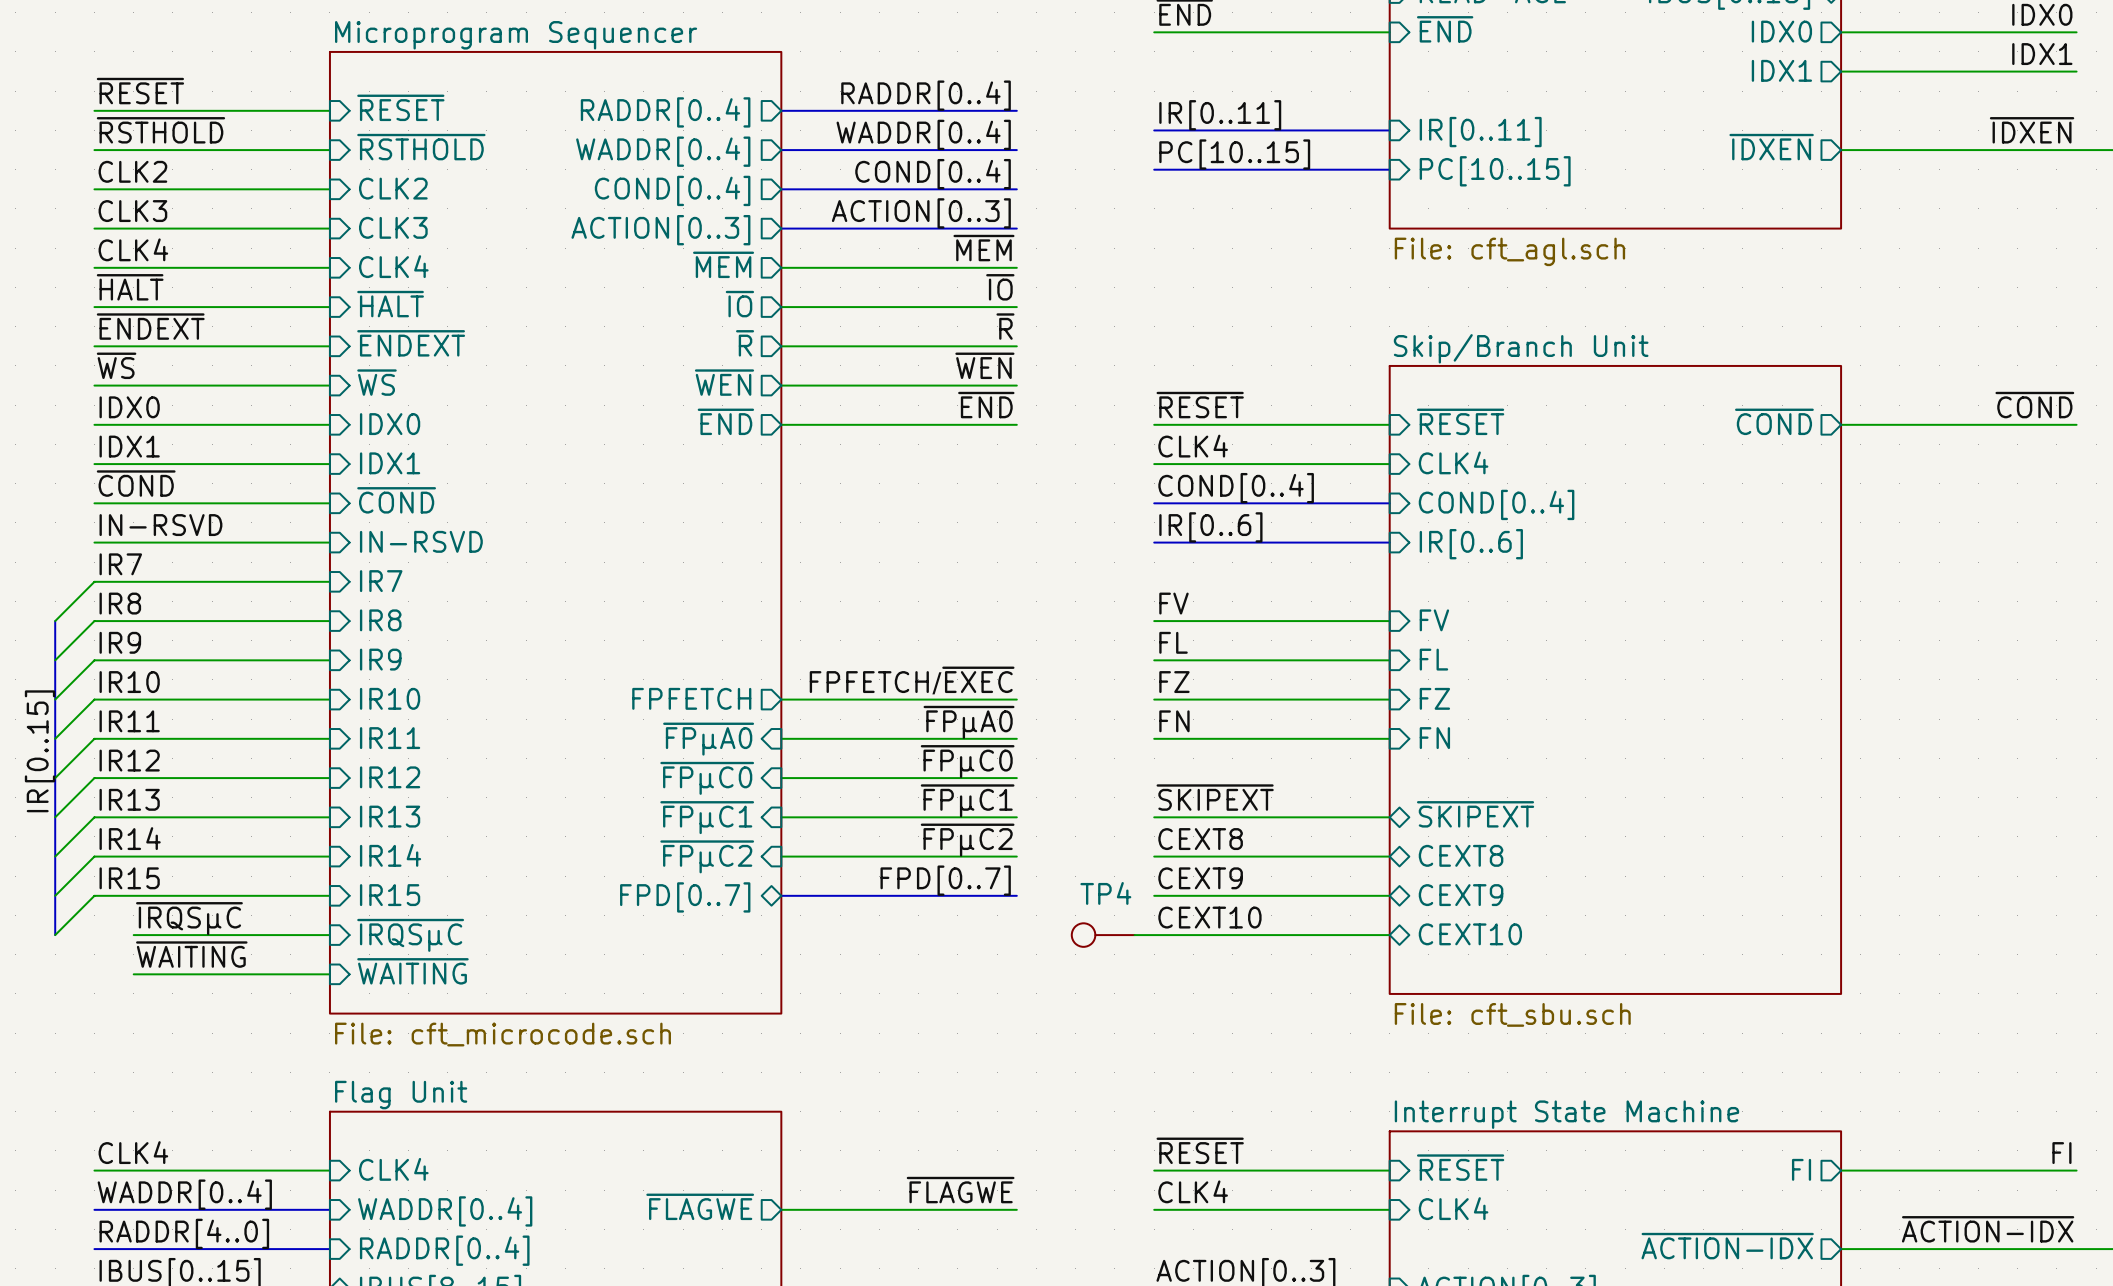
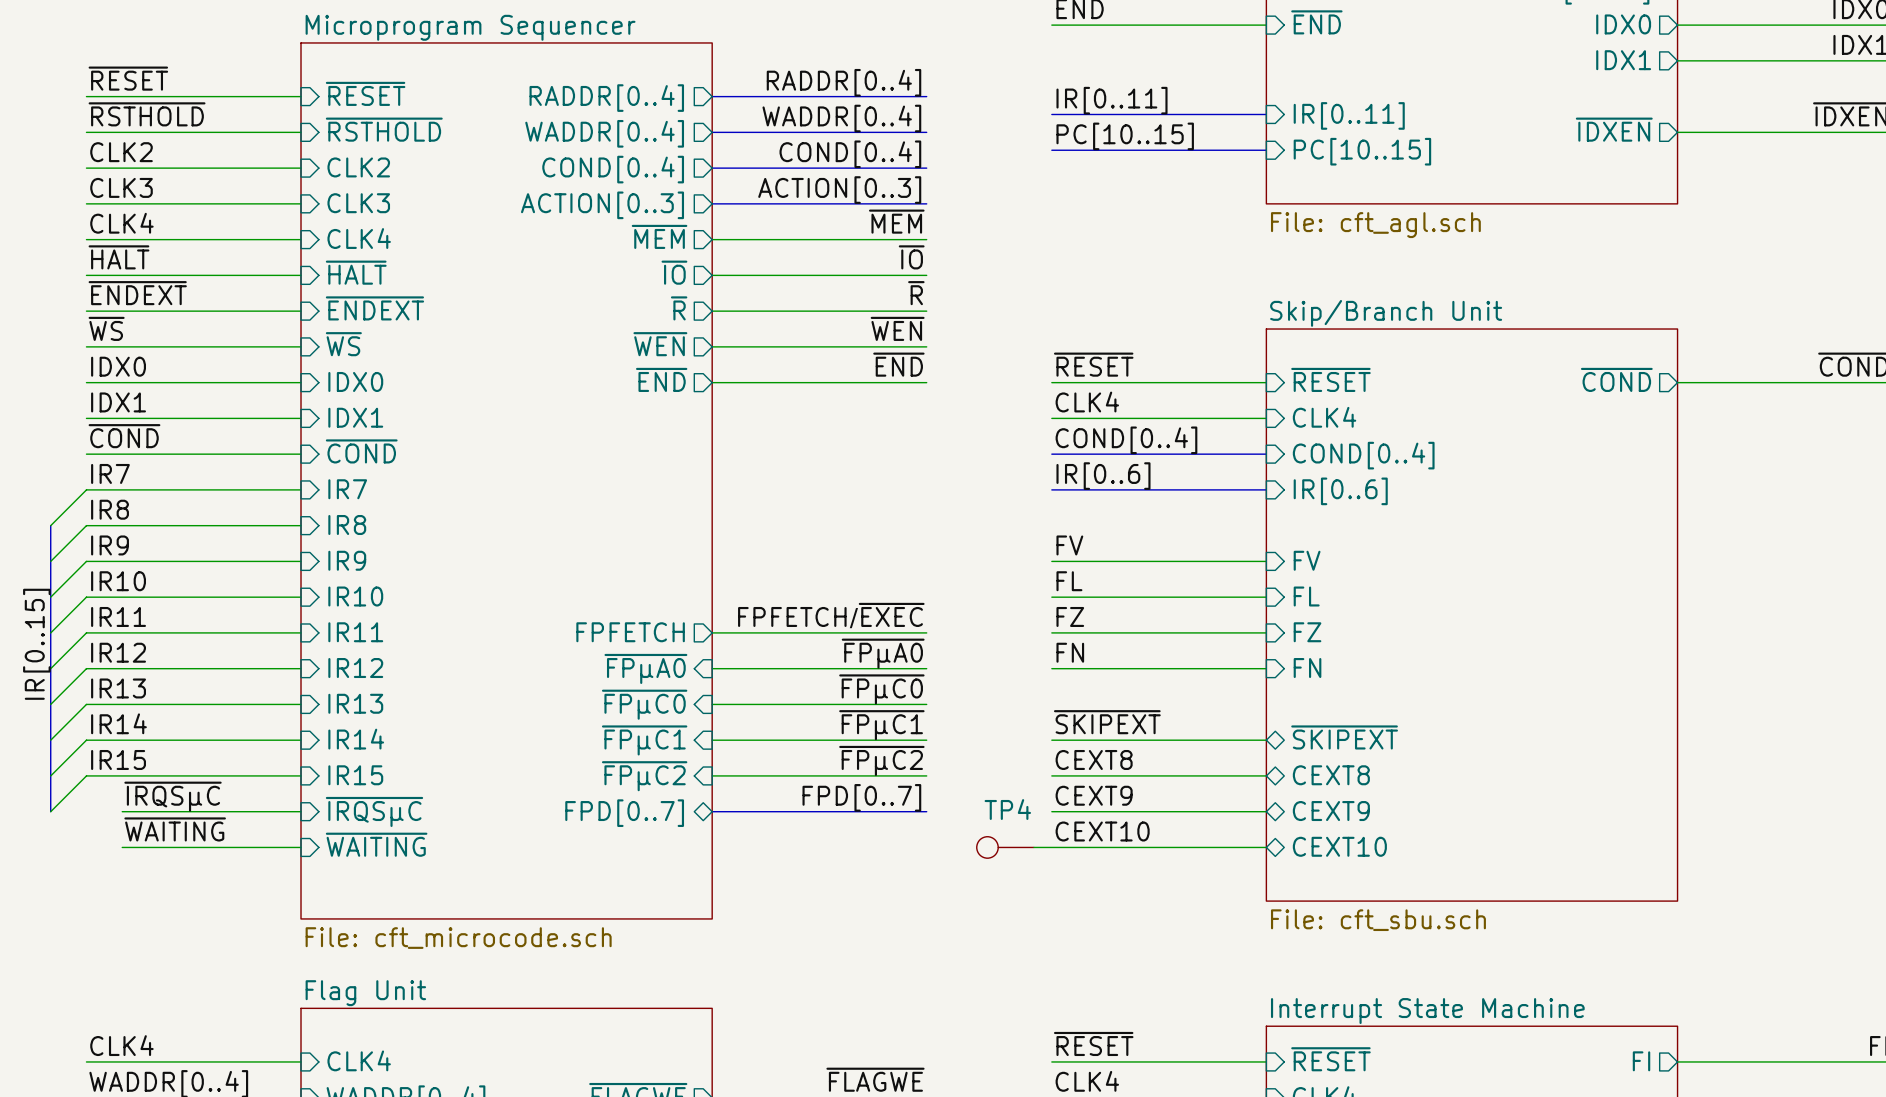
label: IN-RSVD (160, 525) -> IR7 (110, 473)
sheet pin: IN-RSVD (421, 541) -> IR7 (347, 489)
wire: none -> (86, 489) (50, 525)
label: IR7 (120, 564) -> IR8 (110, 509)
sheet pin: IR7 (381, 581) -> IR8 (347, 524)
label: IR8 (120, 603) -> IR9 (110, 545)
sheet pin: IR8 (380, 620) -> IR9 (347, 560)
label: IR9 (120, 642) -> IR10 (118, 581)
sheet pin: IR9 (380, 659) -> IR10 (355, 596)
label: IR10 (129, 682) -> IR11 (118, 616)
sheet pin: IR10 (390, 698) -> IR11 (355, 632)
label: IR11 (129, 721) -> IR12 (118, 652)
sheet pin: IR11 (390, 738) -> IR12 (355, 668)
label position: IR[0..15] (40, 751) -> IR[0..15] (36, 644)
label: IR12 (129, 760) -> IR13 (118, 688)
sheet pin: IR12 (390, 777) -> IR13 (355, 703)
label: IR13 (129, 799) -> IR14 (118, 723)
sheet pin: IR13 (390, 816) -> IR14 (356, 739)
label: IR14 (130, 838) -> IR15 (118, 759)
sheet pin: IR14 (390, 855) -> IR15 (355, 775)
label: IR15 (129, 878) -> none
label: none -> ~{IRQSµC} (173, 796)
bus: (55, 895) (55, 935) -> (50, 525) (50, 561)
wire: (133, 895) (94, 895) (55, 935) -> none
sheet pin: IR15 (390, 895) -> ~{IRQSµC} (374, 811)
label: ~{IRQSµC} (189, 918) -> ~{WAITING} (175, 829)
sheet pin: ~{IRQSµC} (410, 935) -> ~{WAITING} (376, 844)
label: ~{WAITING} (191, 954) -> none
sheet pin: ~{WAITING} (412, 971) -> none
wire: (133, 974) (329, 974) -> none

